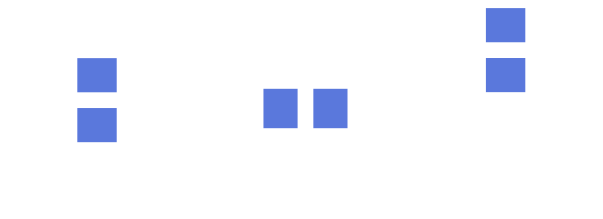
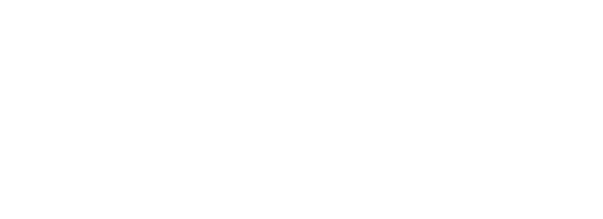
part: (505, 50) -> none
part: (97, 100) -> none
part: (305, 108) -> none

